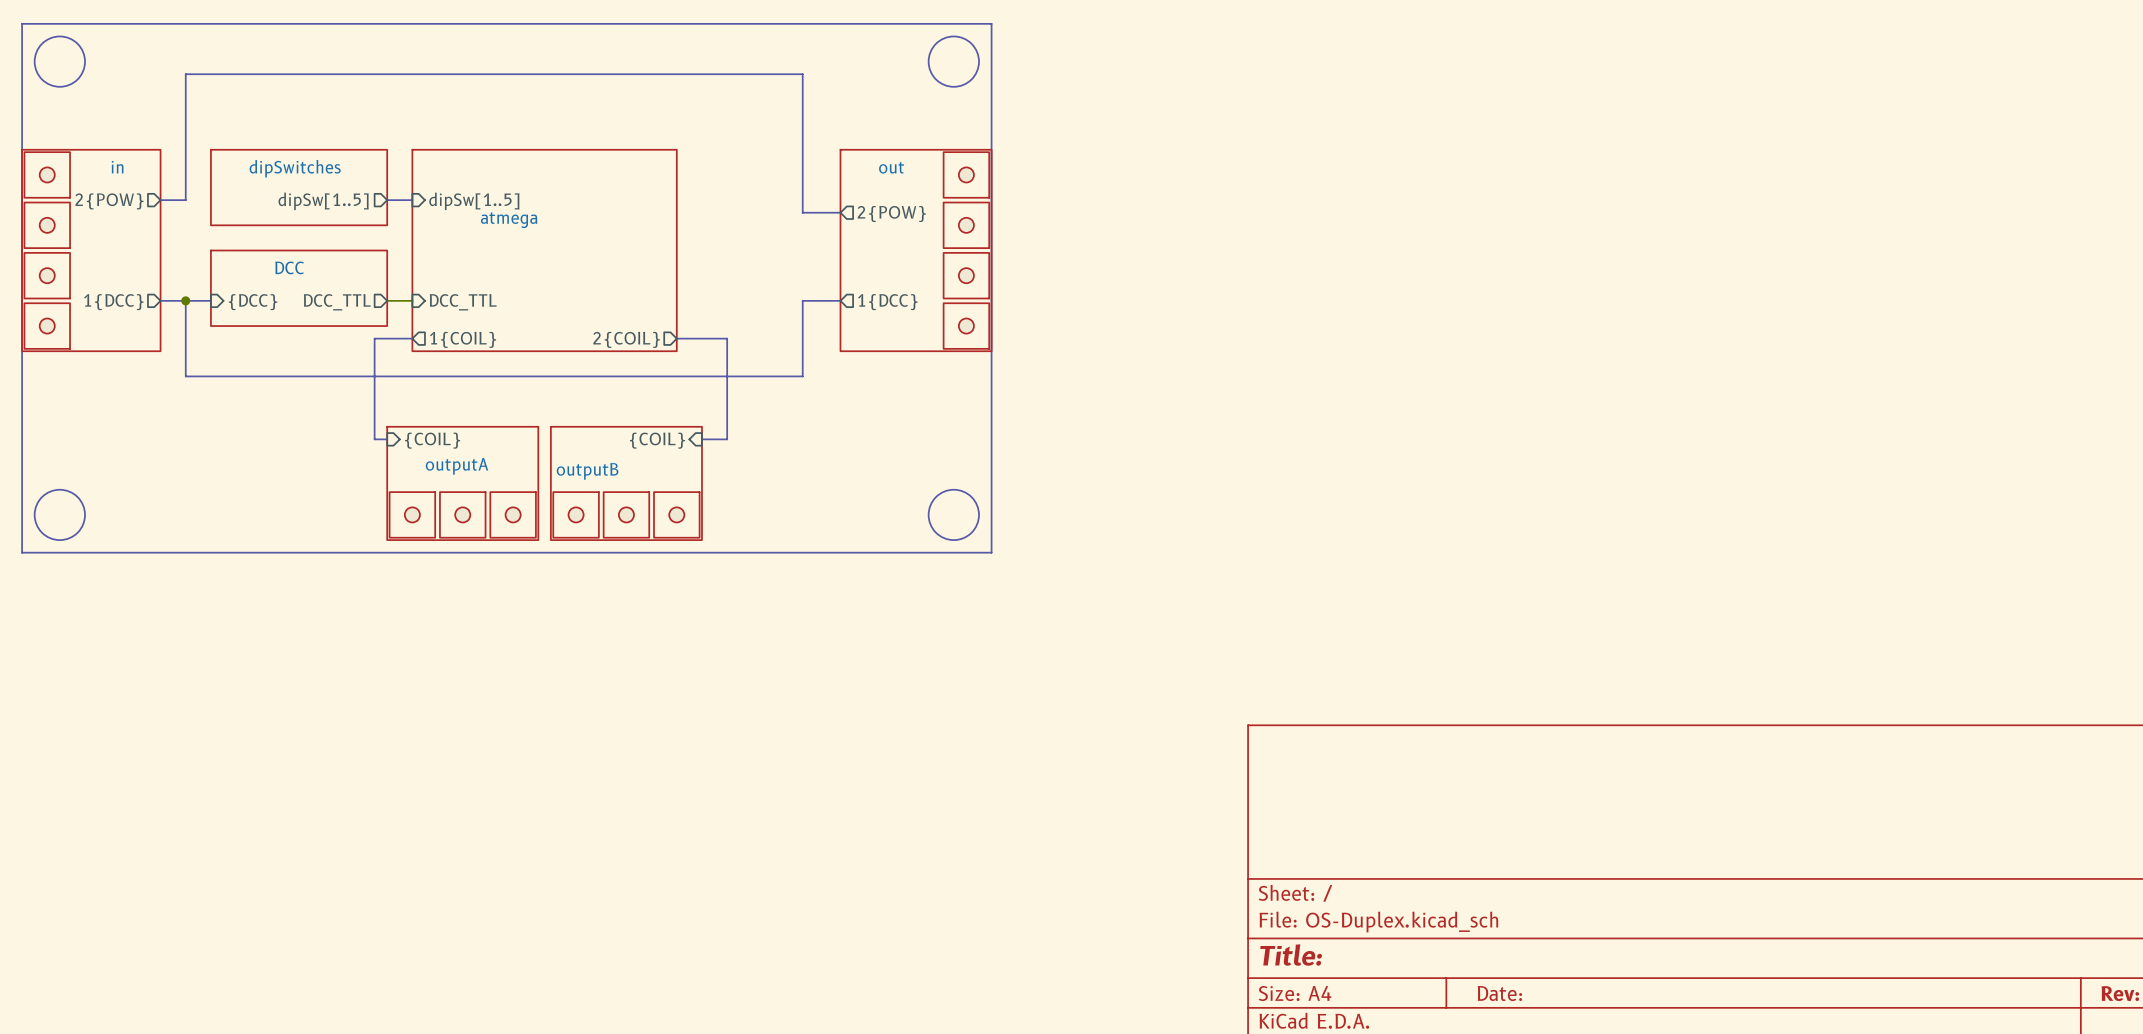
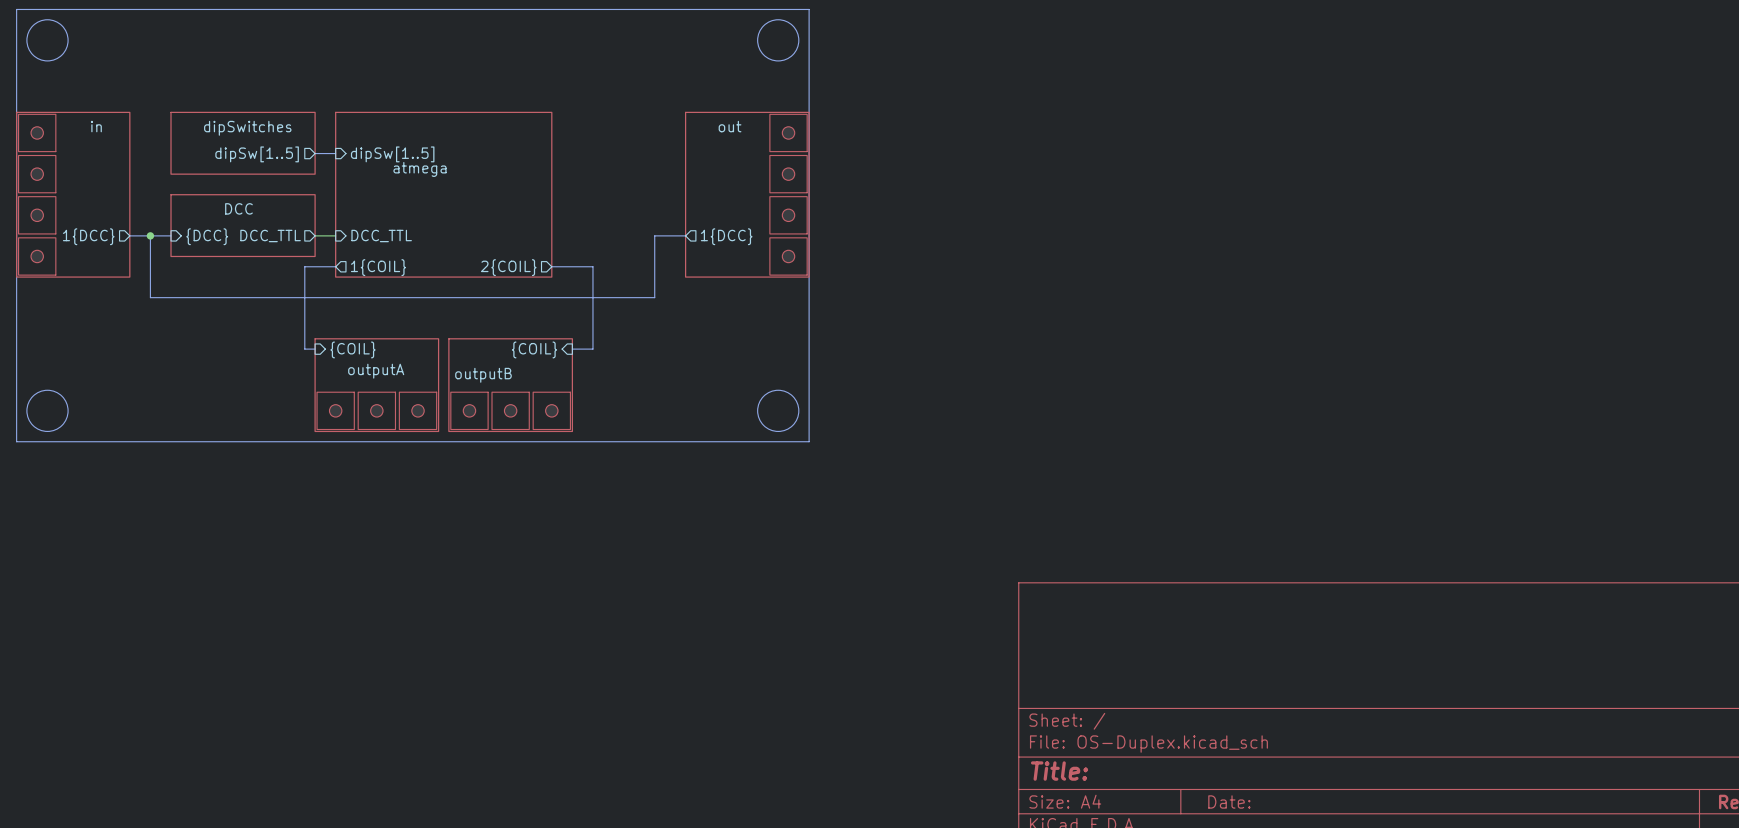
bus: (160, 200) (185, 200) (185, 74) (802, 74) (802, 212) (840, 212) -> none
sheet pin: 2{POW} (109, 201) -> none
sheet pin: 2{POW} (891, 214) -> none

